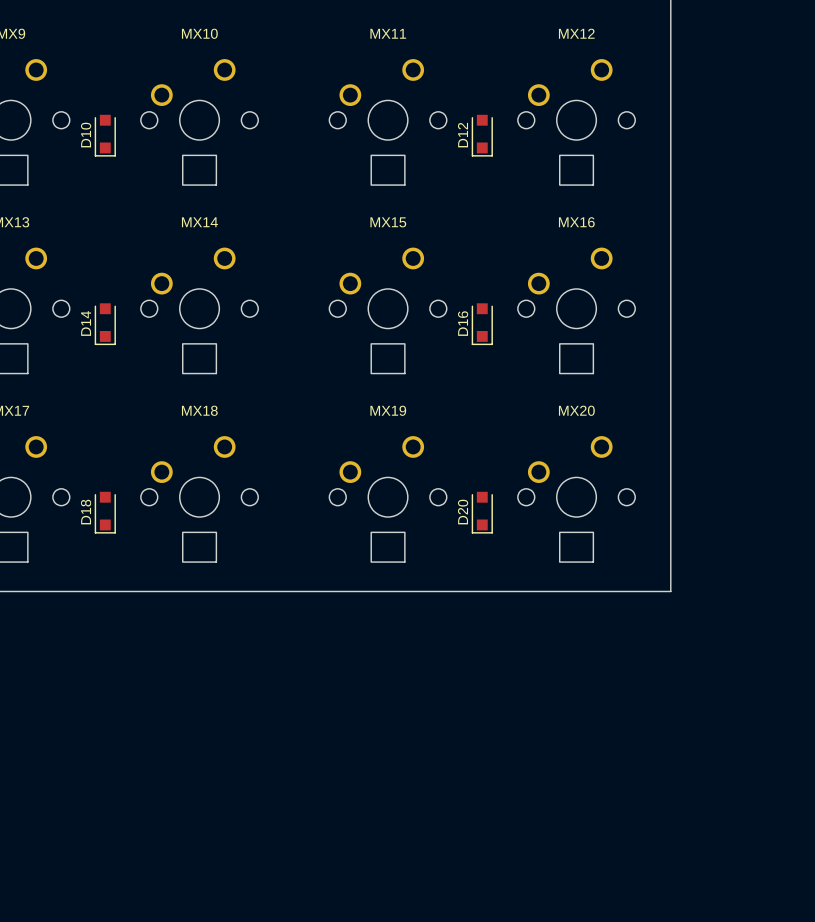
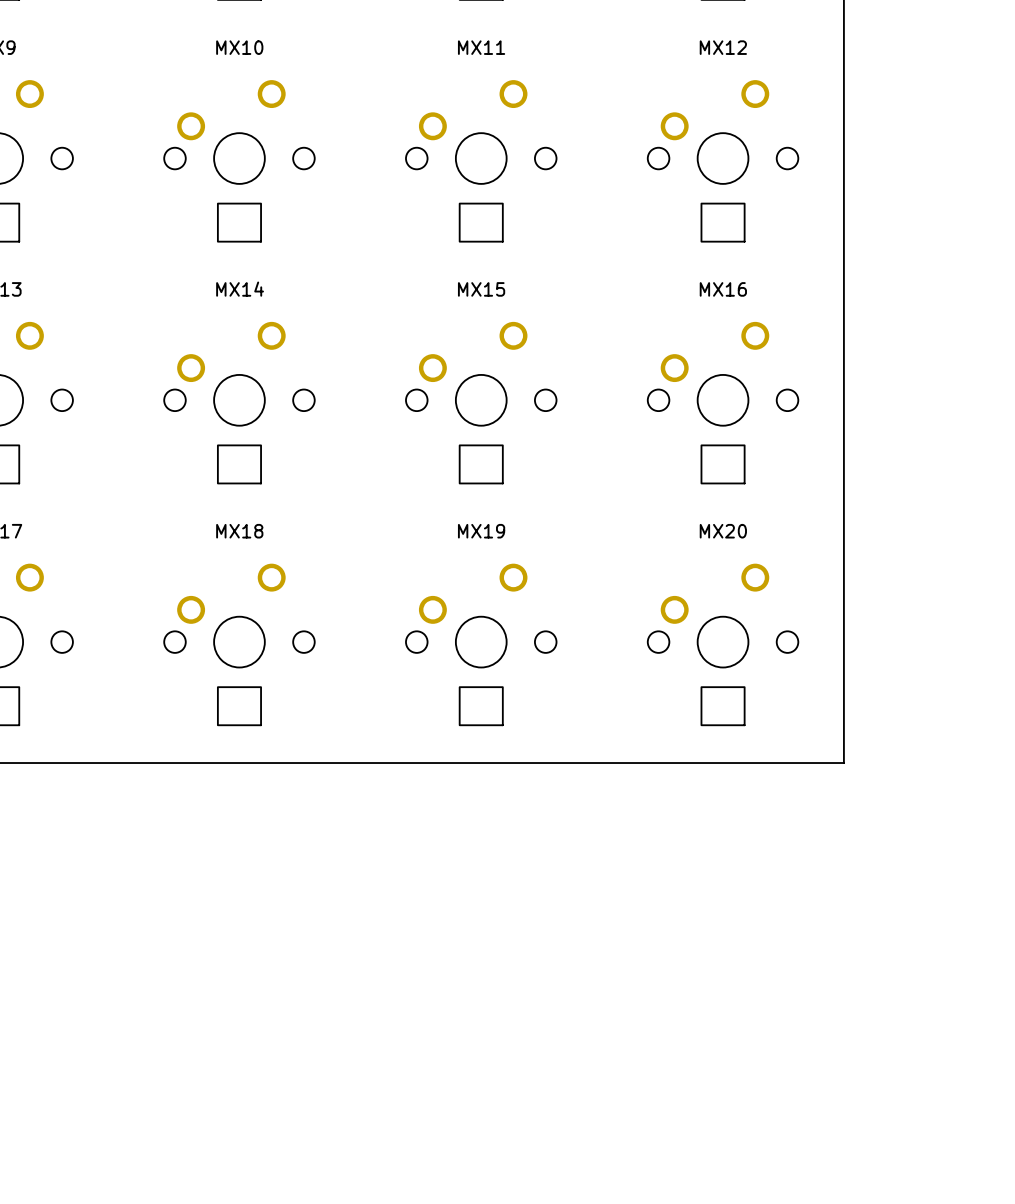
D10: (105, 135) -> none
D12: (482, 135) -> none
D14: (105, 324) -> none
D16: (482, 324) -> none
D18: (105, 512) -> none
D20: (482, 512) -> none

